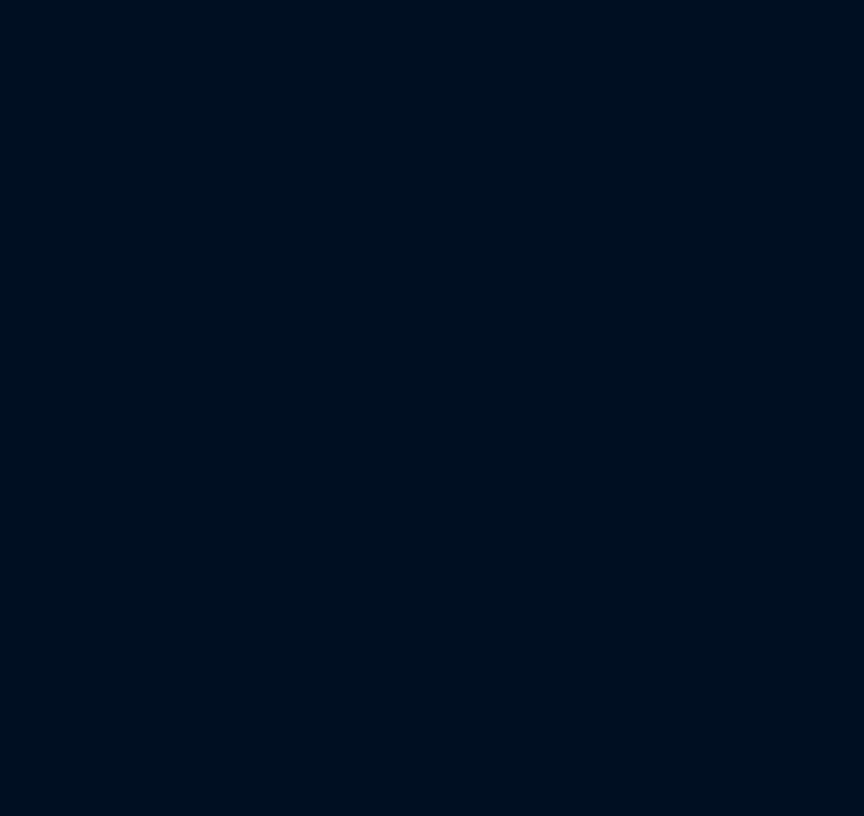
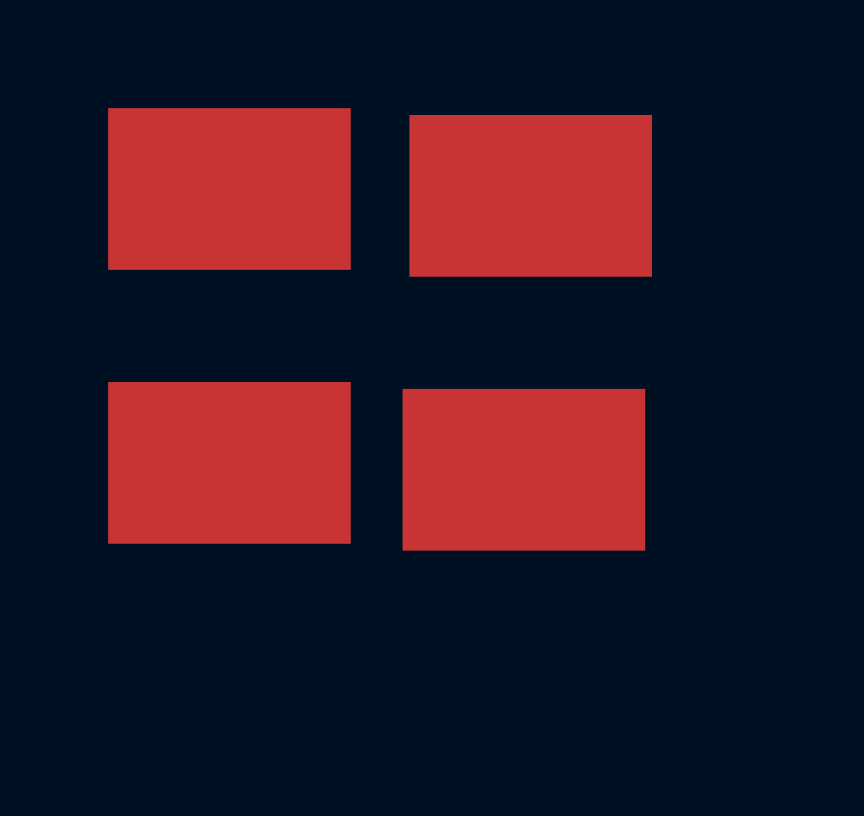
part: none -> (229, 189)
part: none -> (530, 195)
part: none -> (229, 462)
part: none -> (523, 469)

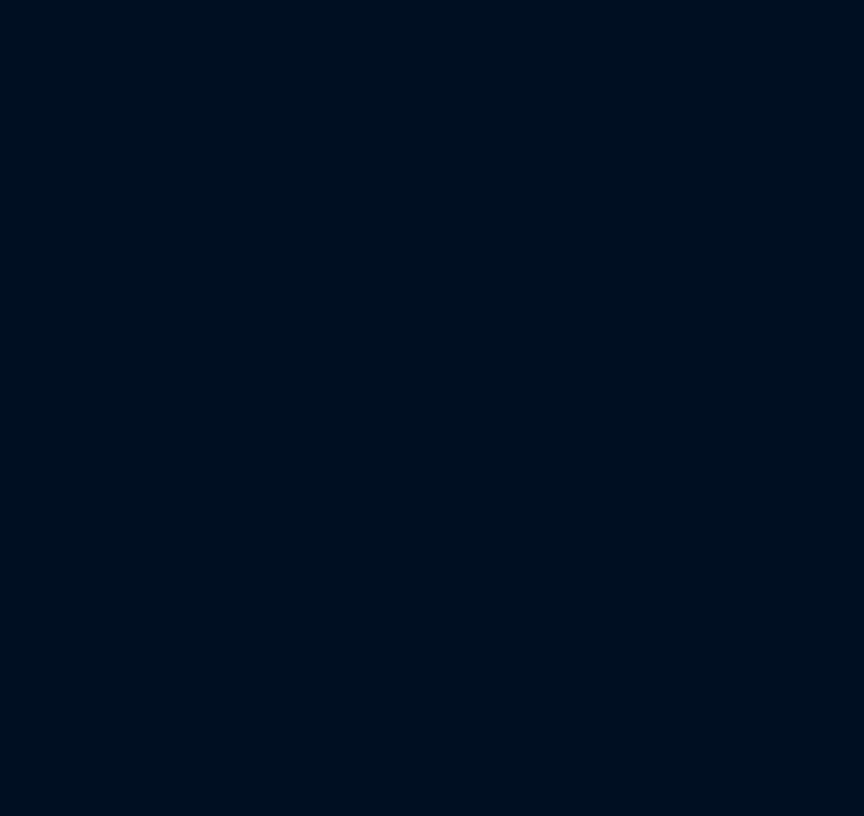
part: (229, 189) -> none
part: (530, 195) -> none
part: (229, 462) -> none
part: (523, 469) -> none

